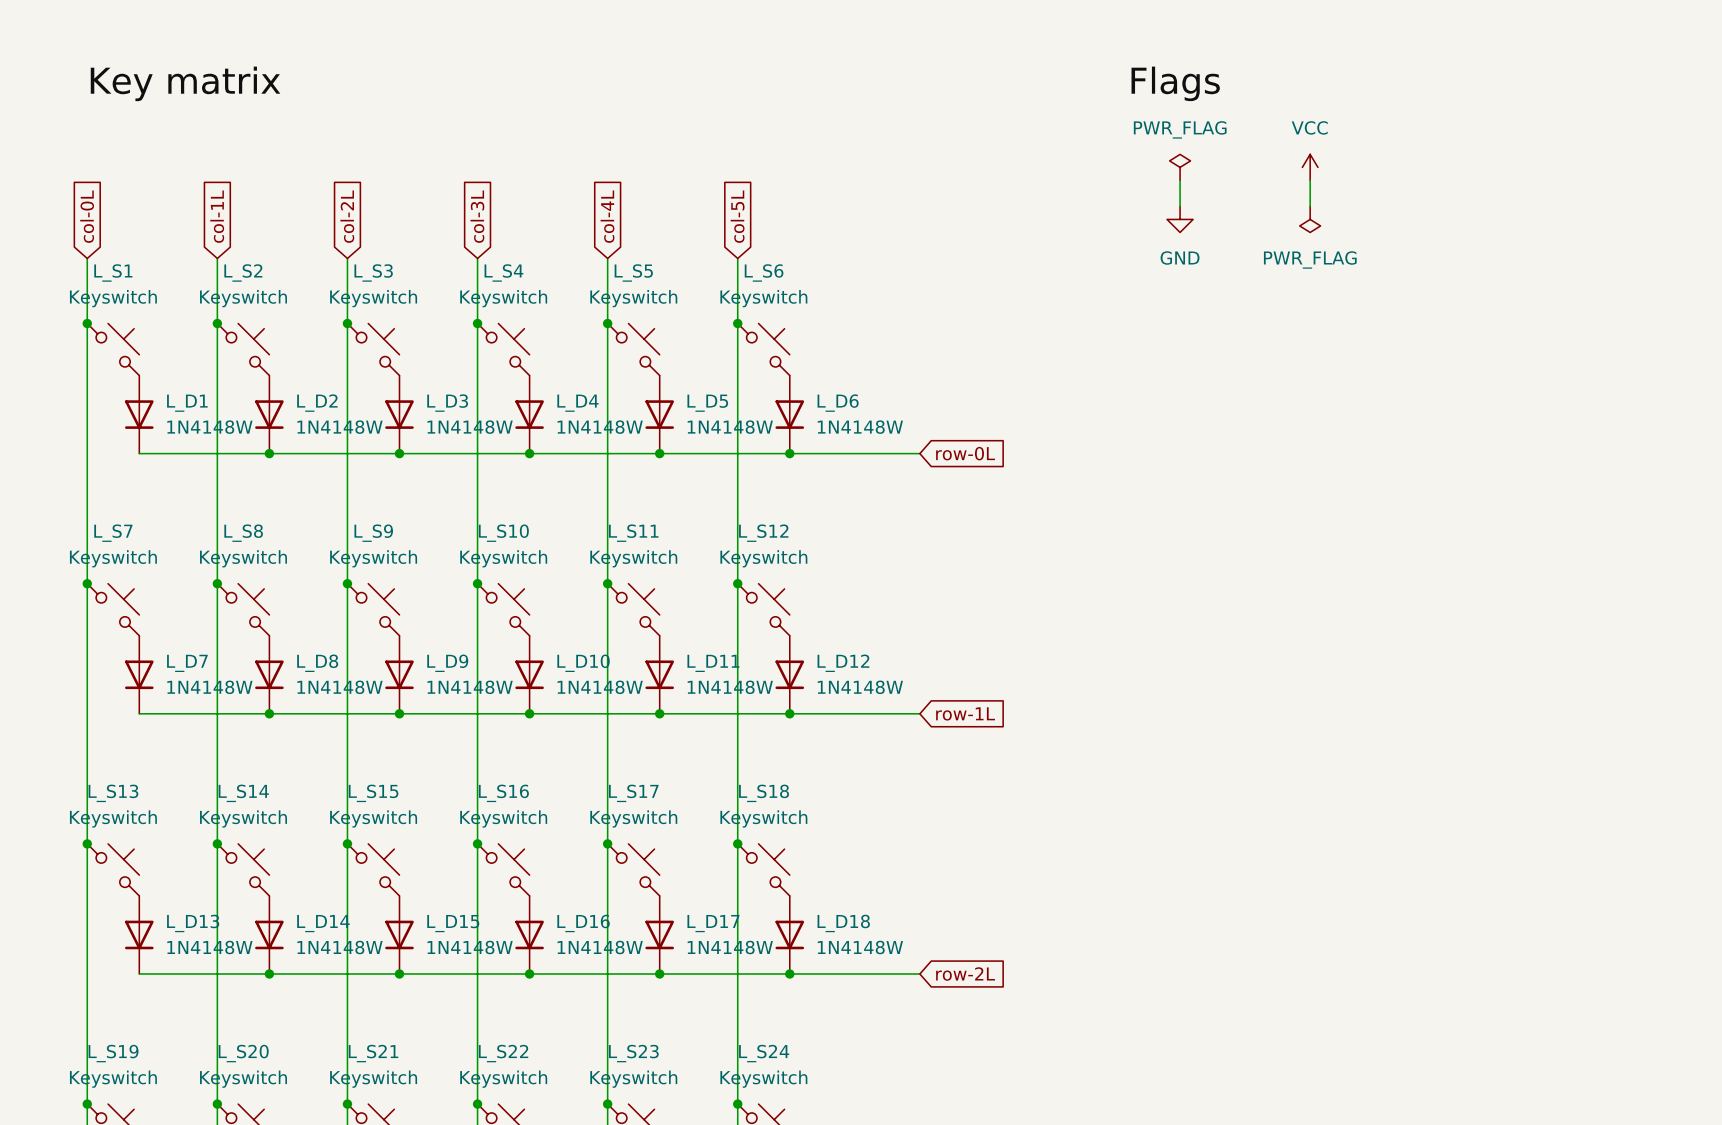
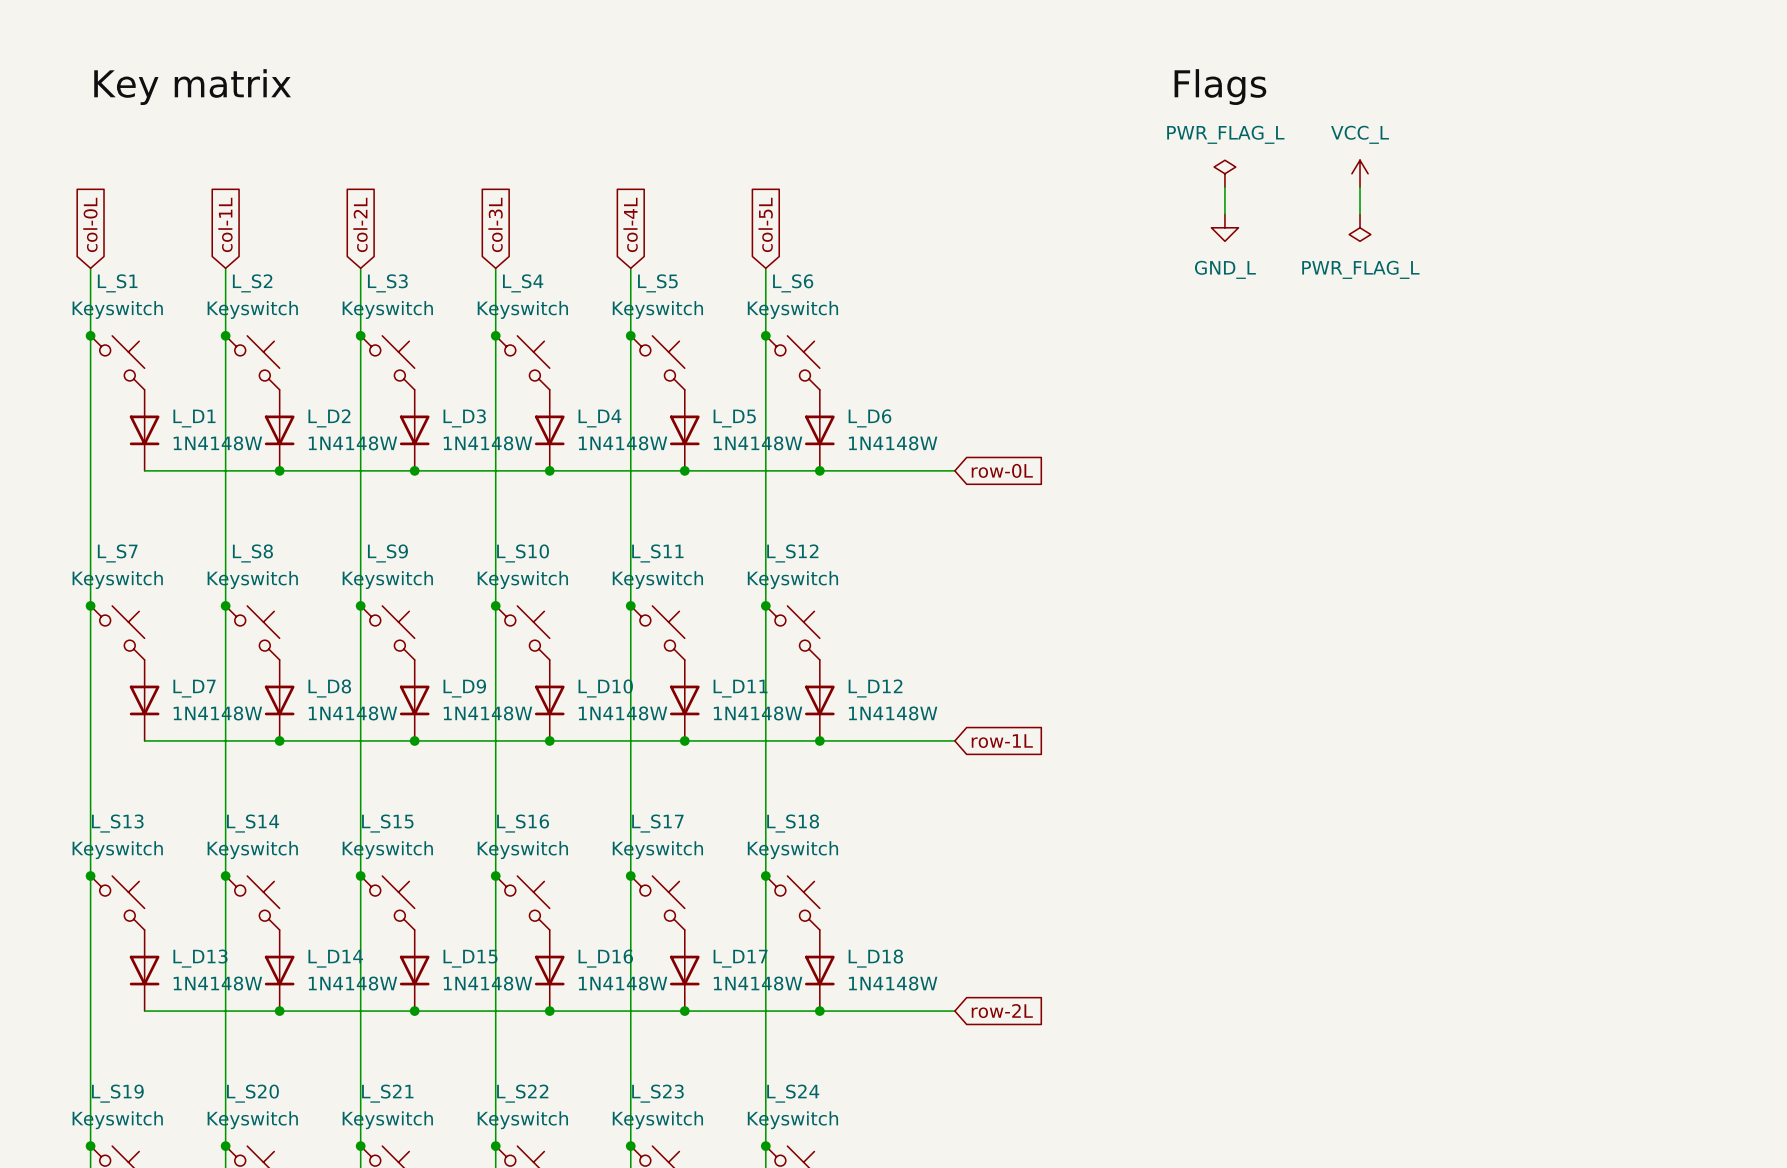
power symbol: PWR_FLAG (1180, 167) -> PWR_FLAG_L (1224, 173)
power symbol: VCC (1310, 167) -> VCC_L (1360, 173)
power symbol: GND (1180, 219) -> GND_L (1224, 227)
power symbol: PWR_FLAG (1310, 219) -> PWR_FLAG_L (1360, 227)

